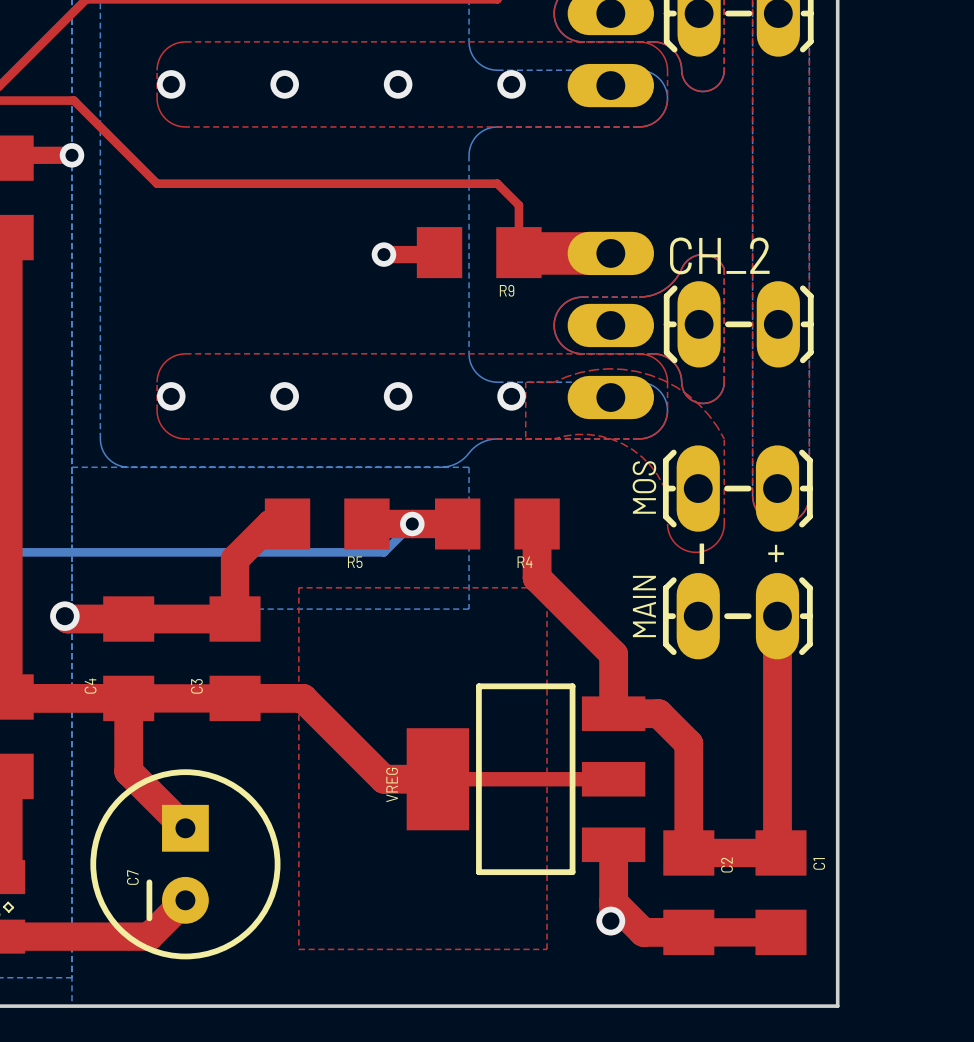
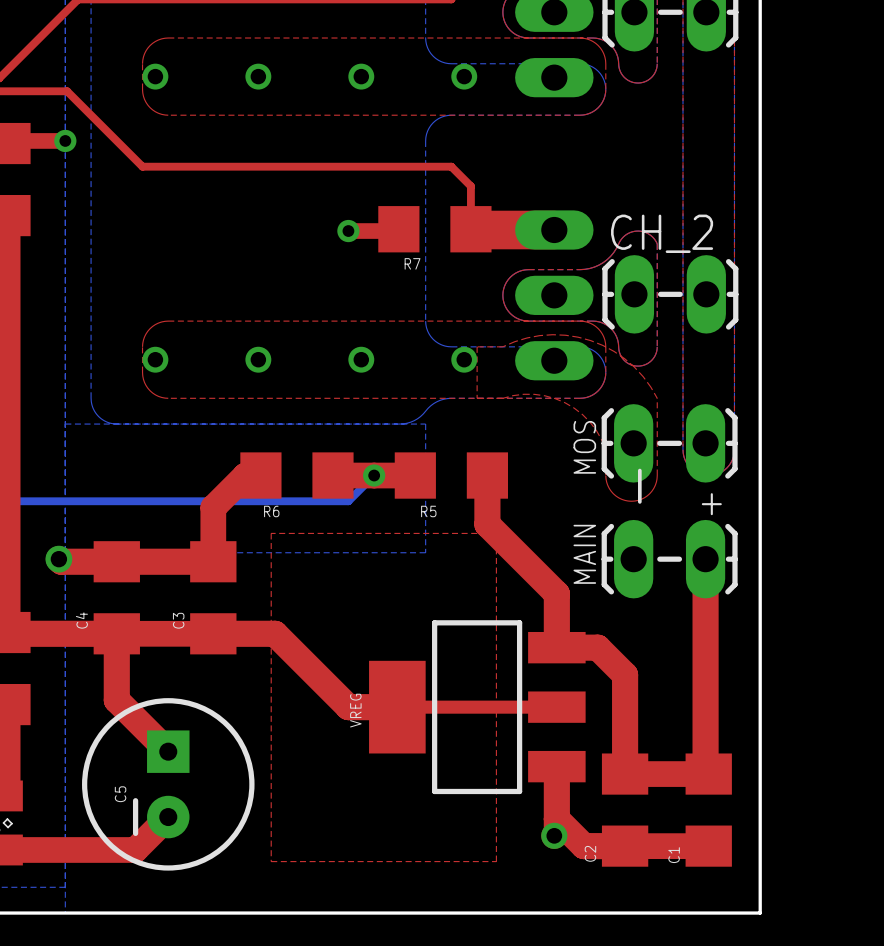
R9 name: R9 (507, 290) -> R7 (412, 263)
R5 name: R5 (355, 562) -> R6 (271, 511)
R4 name: R4 (525, 562) -> R5 (428, 511)
C1 name position: C1 (819, 863) -> C1 (674, 855)
C2 name position: C2 (727, 865) -> C2 (590, 853)
C7 name: C7 (132, 877) -> C5 (120, 794)

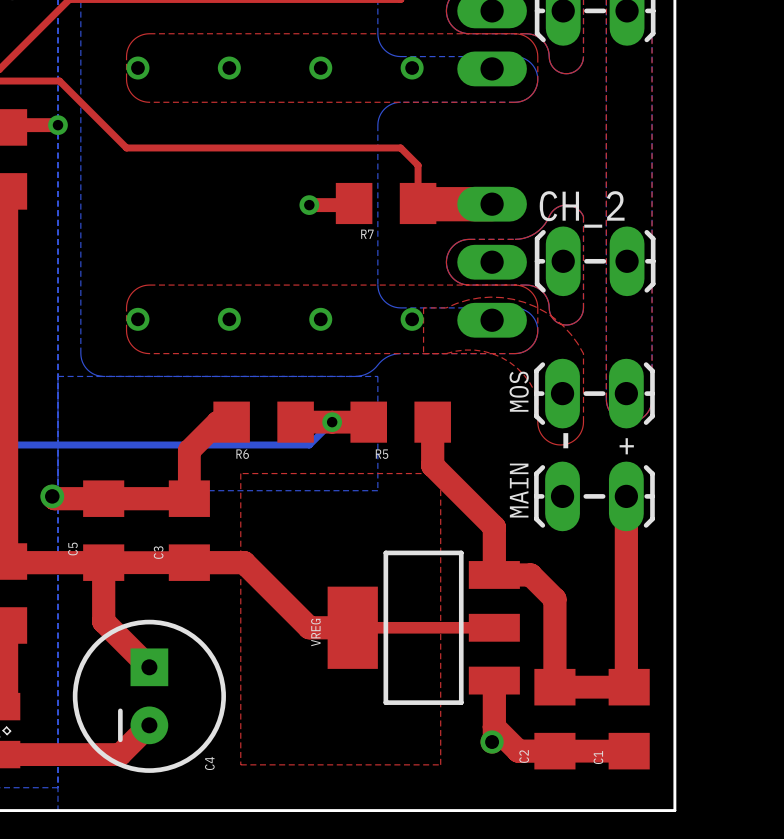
C4 name: C4 (81, 620) -> C5 (72, 549)
C5 name: C5 (120, 794) -> C4 (209, 763)

